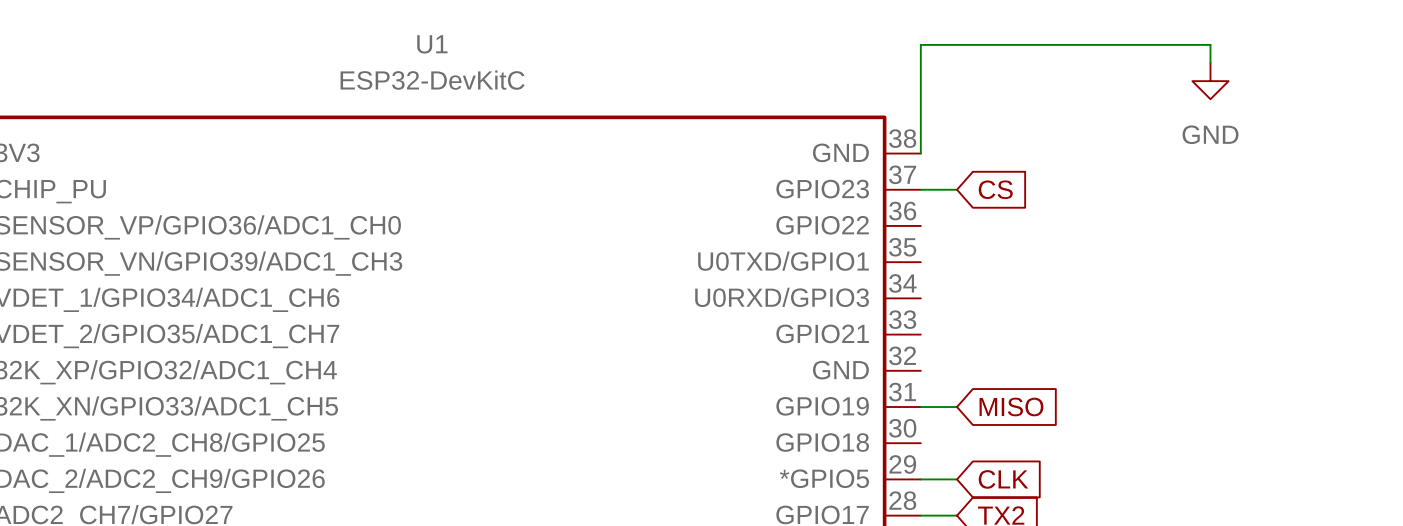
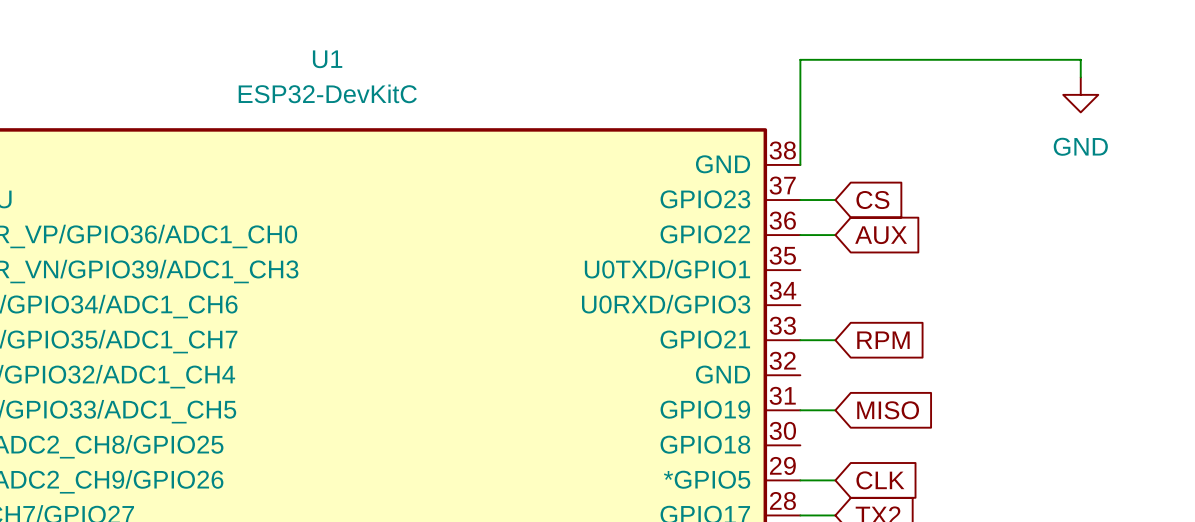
wire: none -> (800, 235) (835, 235)
global label: none -> AUX (881, 235)
wire: none -> (800, 340) (835, 340)
global label: none -> RPM (883, 340)

